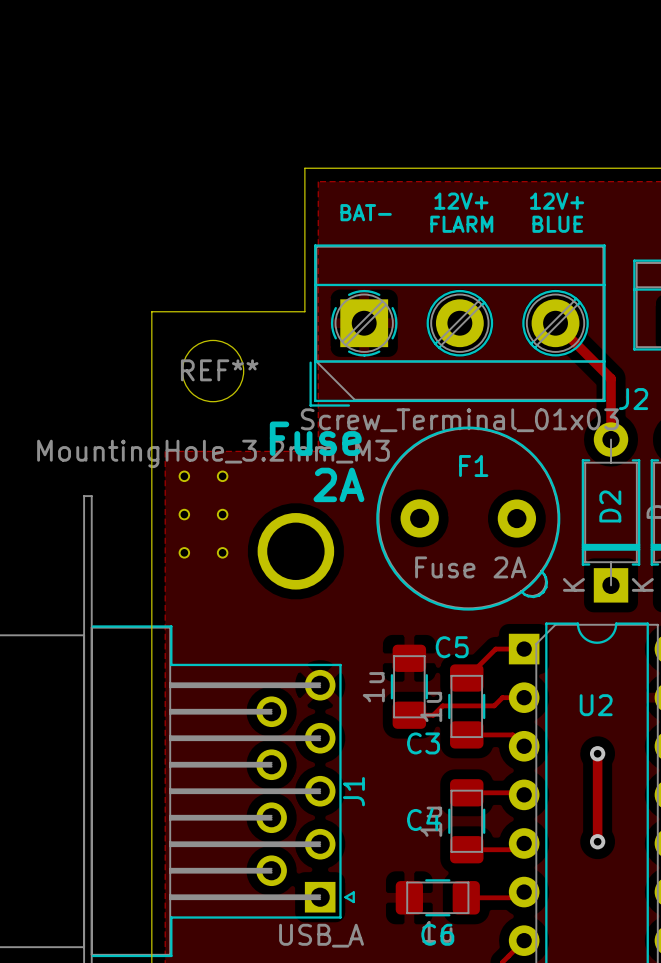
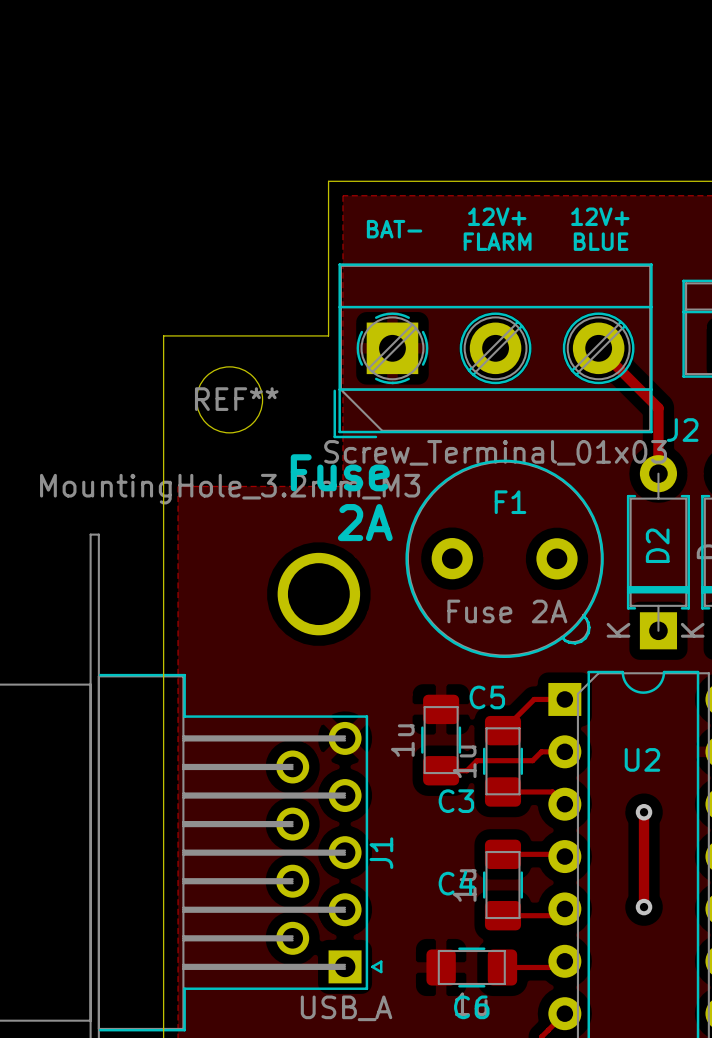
part: (184, 476) -> none
part: (222, 476) -> none
part: (184, 514) -> none
part: (222, 514) -> none
part: (184, 552) -> none
part: (222, 552) -> none

